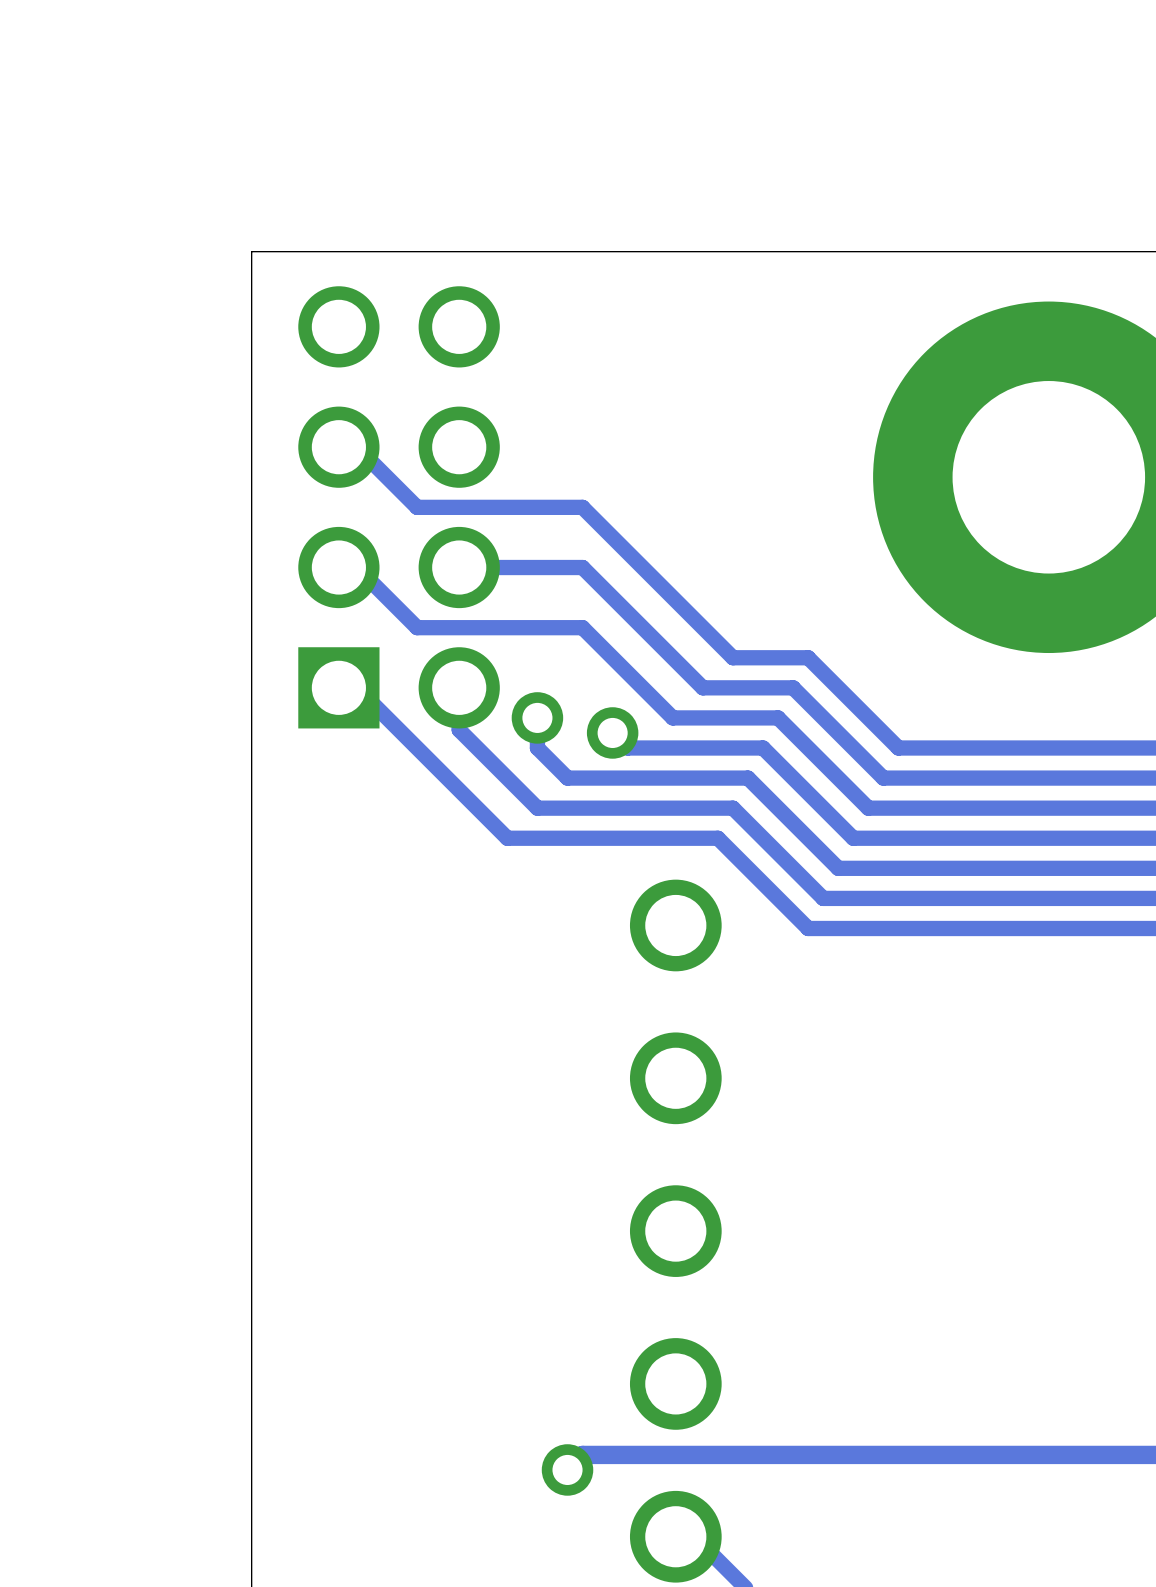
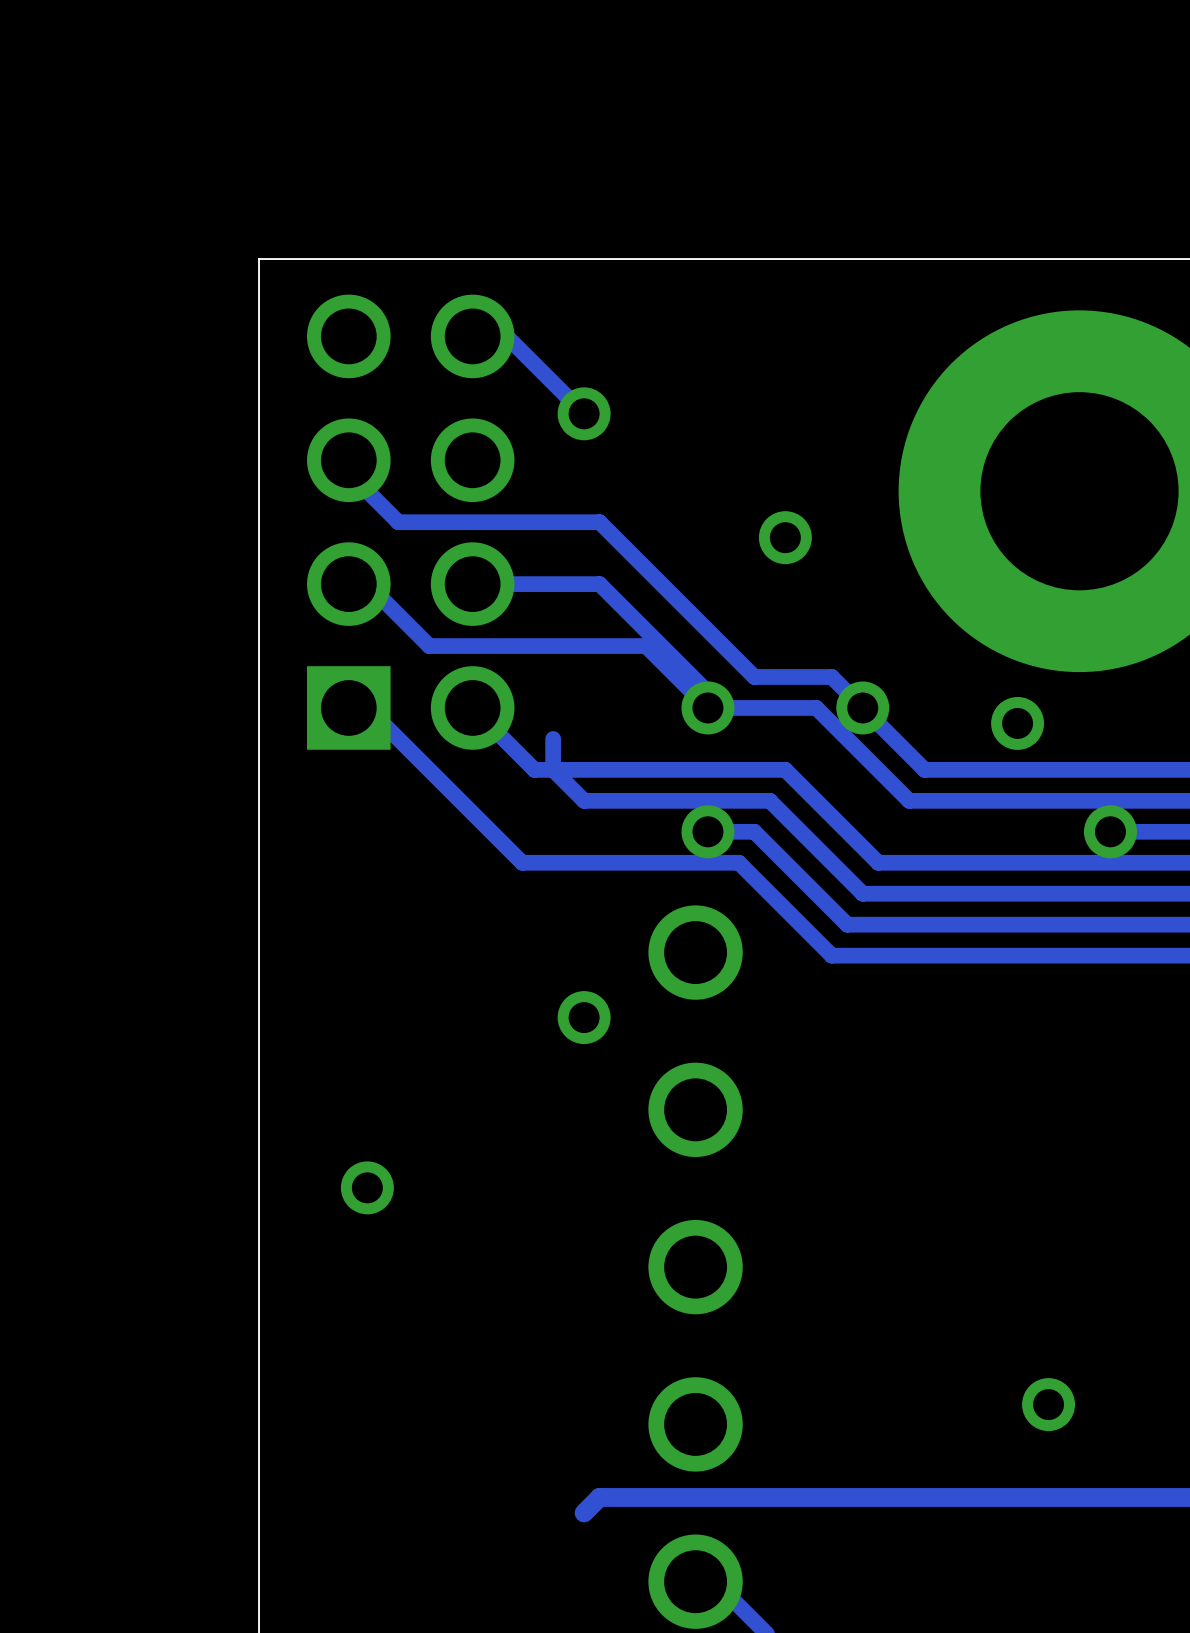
track: none -> (472, 336) (506, 336) (584, 413)
via: none -> (584, 413)
track: (338, 447) (356, 447) (417, 507) -> (348, 460) (348, 472) (398, 522) (429, 522)
via: none -> (785, 537)
track: (582, 627) (672, 717) (778, 717) (868, 808) (1078, 808) -> (599, 646) (646, 646) (707, 707)
track: (459, 687) (459, 729) (537, 808) (687, 808) -> (472, 707) (534, 769) (646, 769)
via: none -> (707, 707)
via: none -> (862, 707)
via: none -> (1017, 723)
via: (537, 717) -> none
via: (612, 732) -> none
via: none -> (707, 831)
via: none -> (1110, 831)
via: none -> (584, 1017)
via: none -> (367, 1187)
via: none -> (1048, 1404)
via: (567, 1469) -> none

